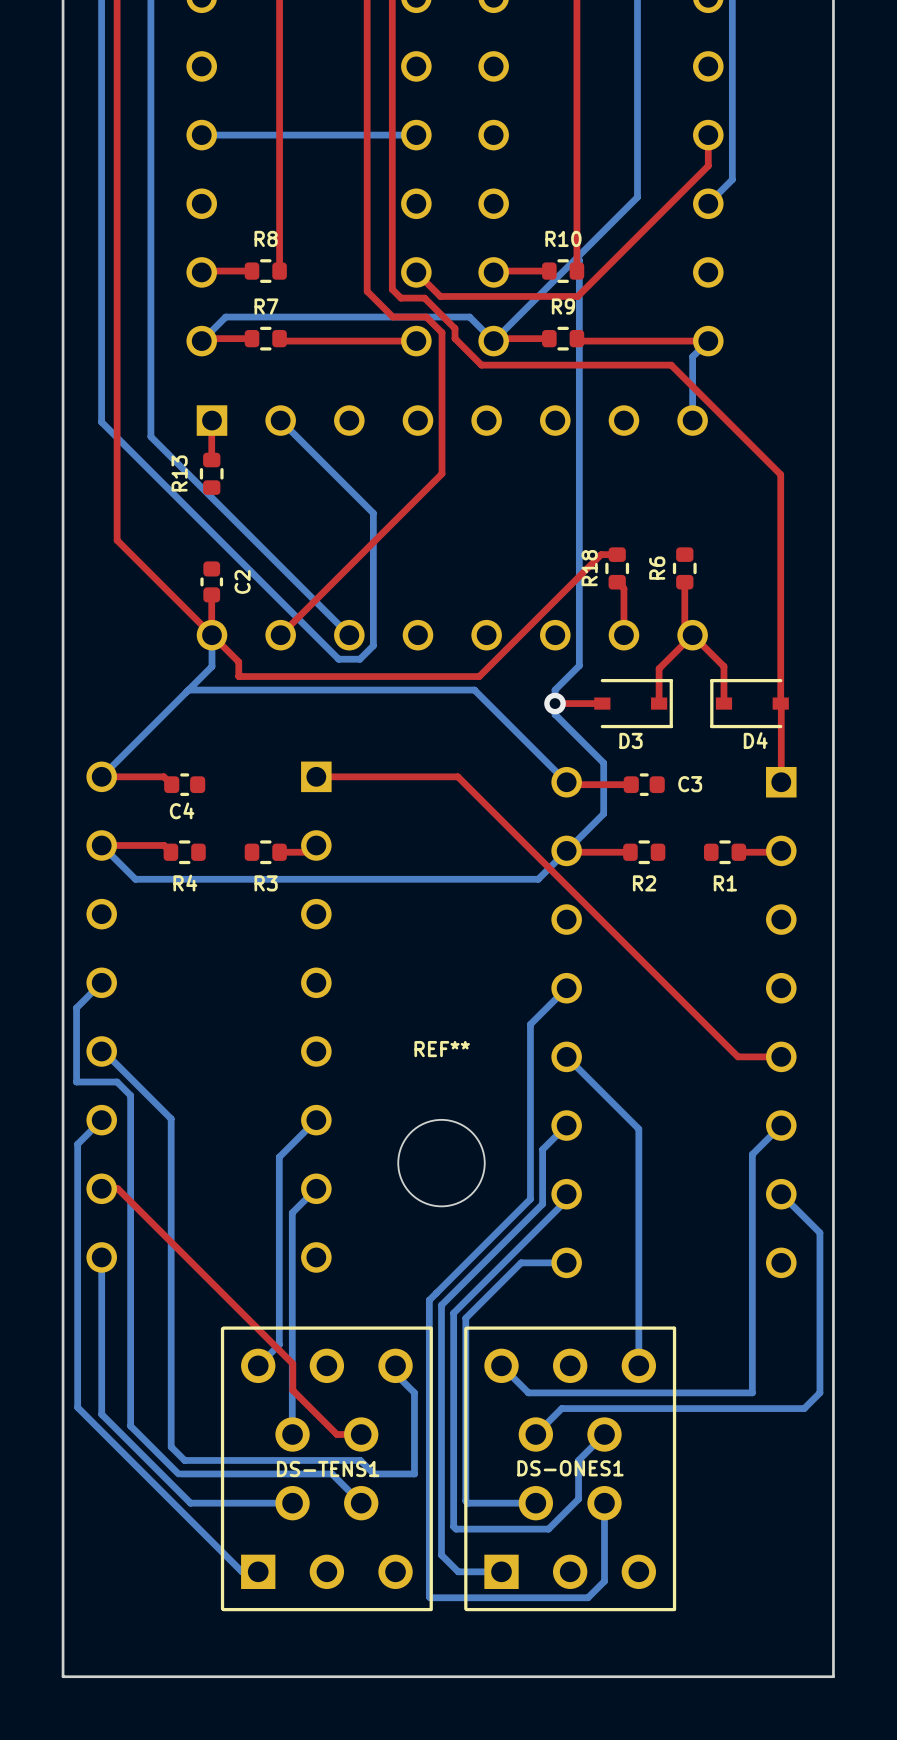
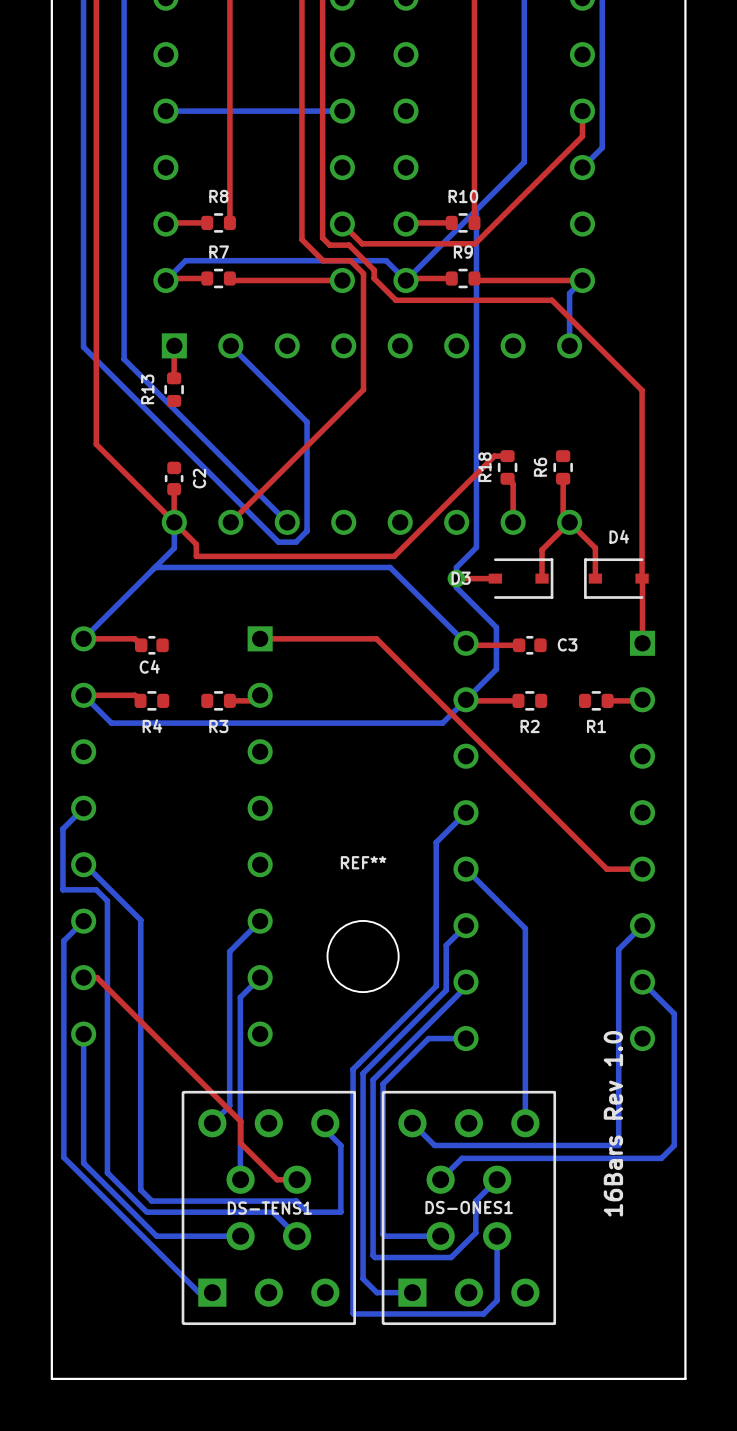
D3 name position: D3 (631, 740) -> D3 (461, 578)
D4 name position: D4 (755, 740) -> D4 (619, 536)
text: none -> 16Bars Rev 1.0 (613, 1123)

